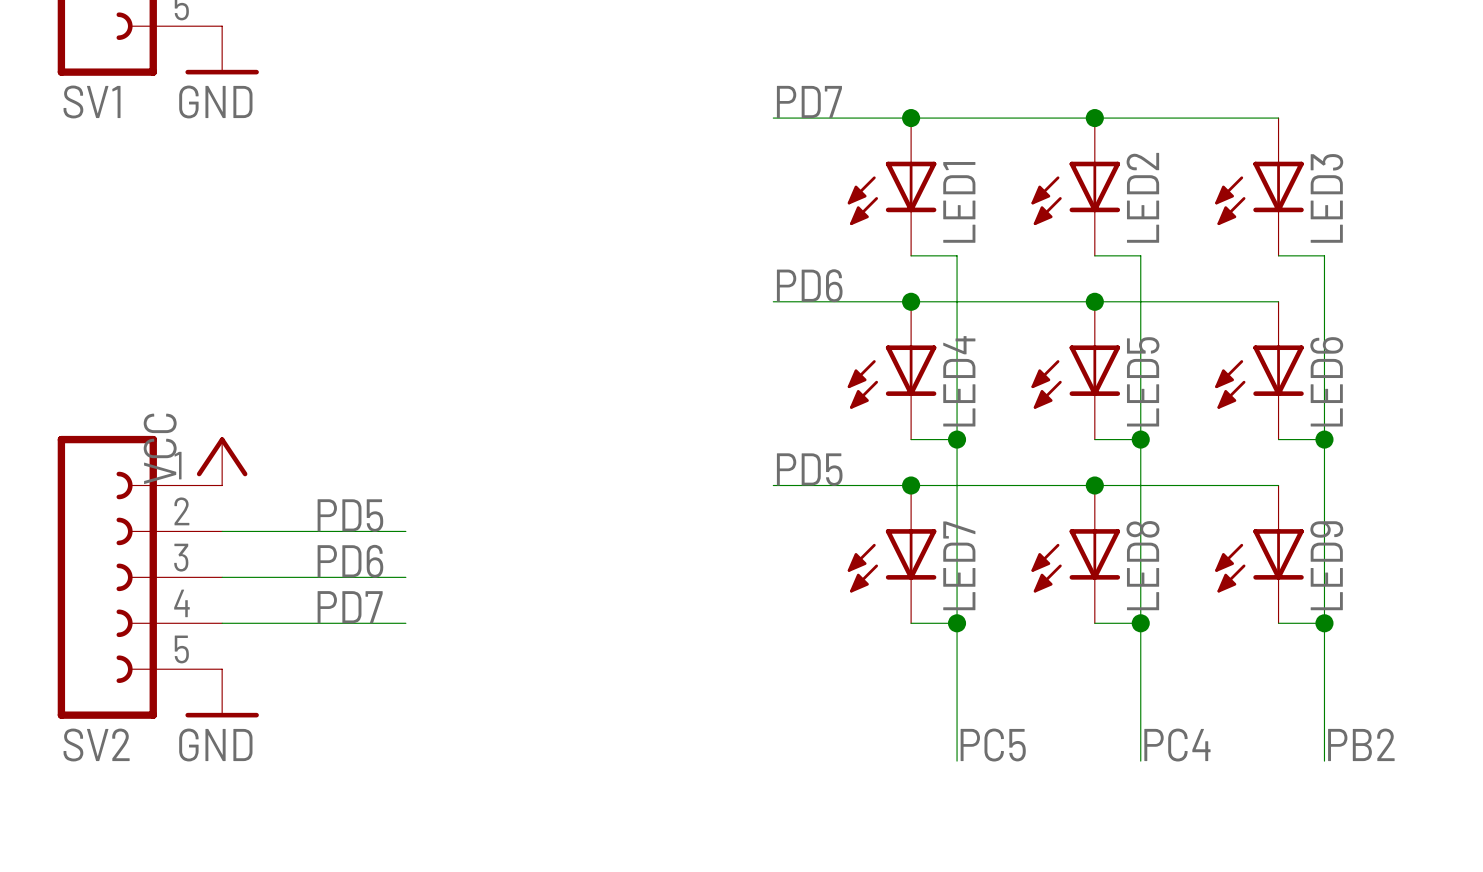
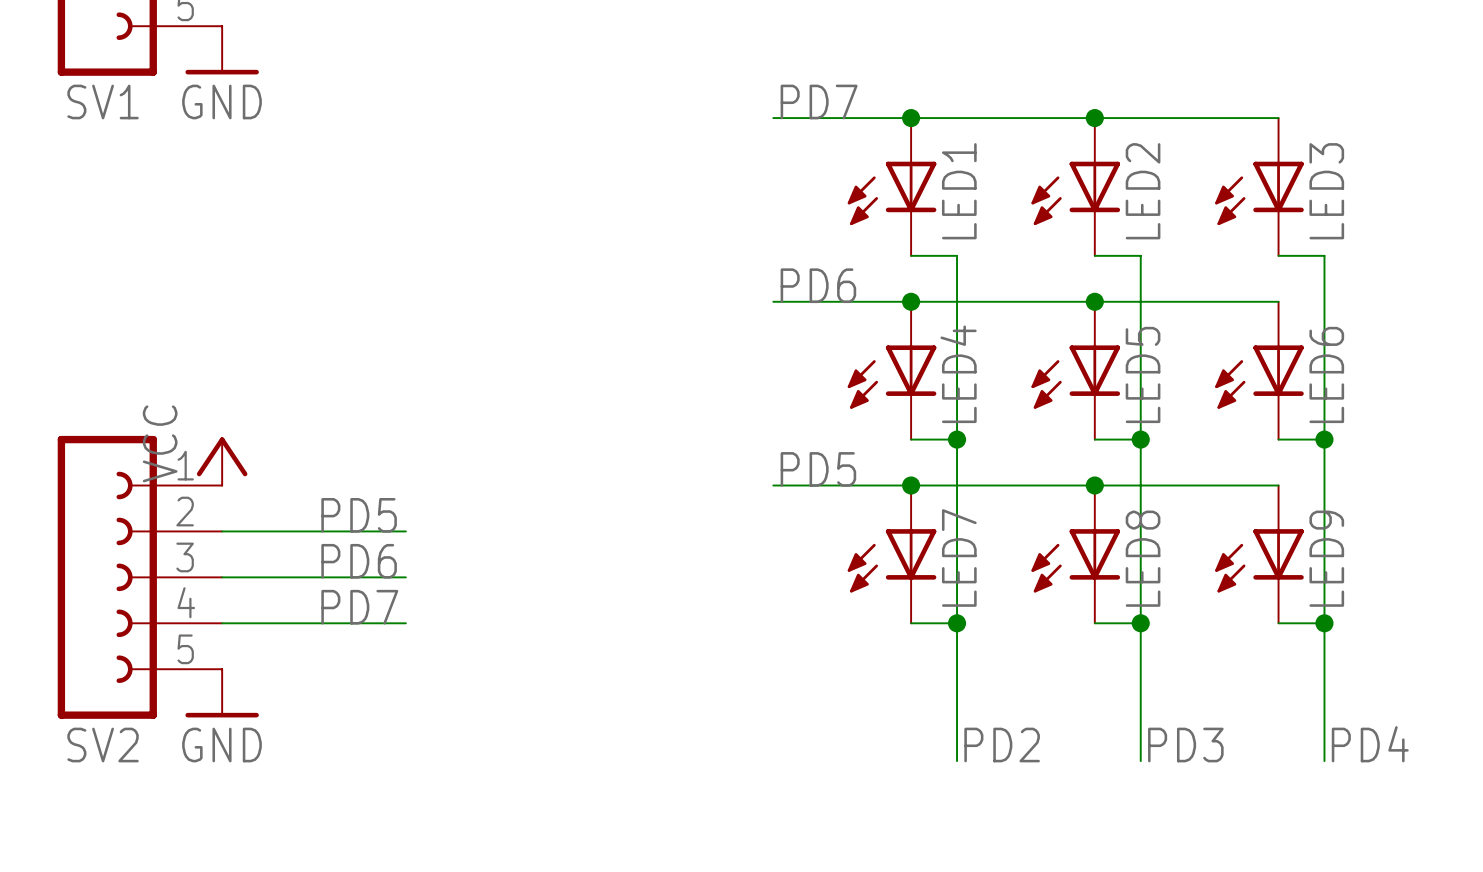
label: PB2 (1361, 744) -> PD4 (1370, 744)
label: PC5 (993, 745) -> PD2 (1002, 745)
label: PC4 (1177, 745) -> PD3 (1185, 745)

